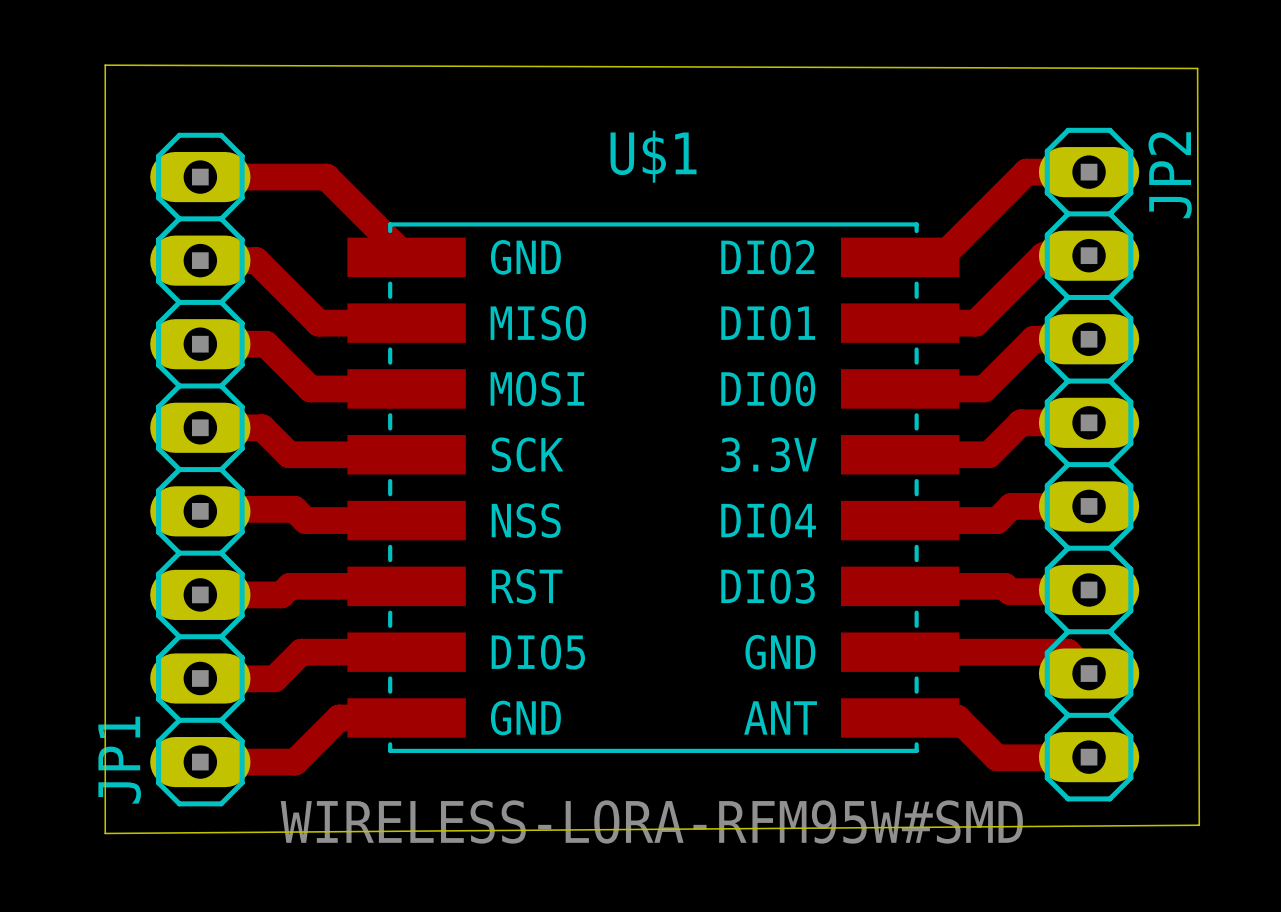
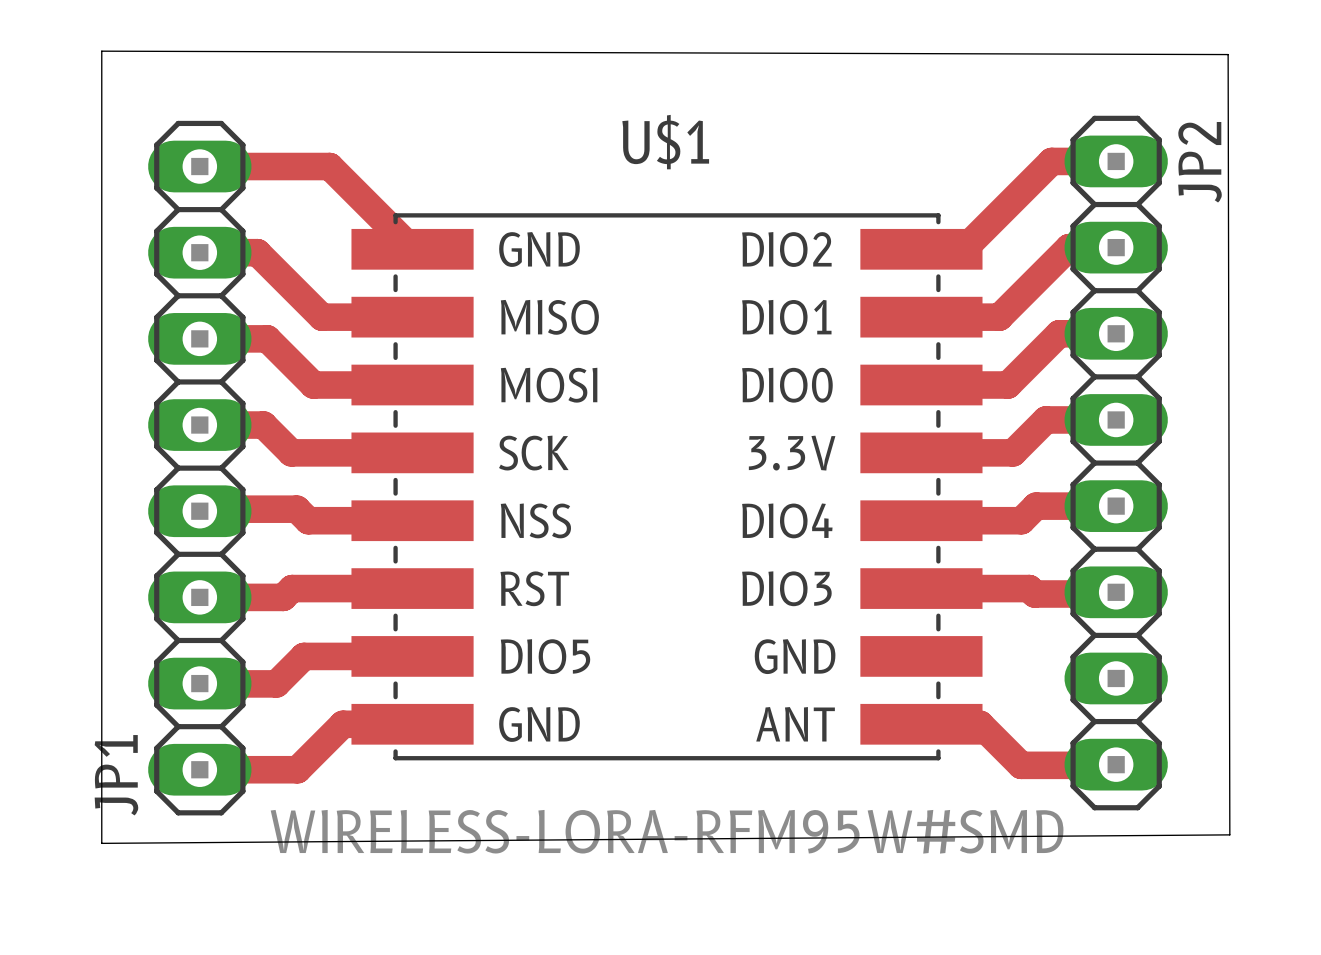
top track: (900, 652) (1067, 652) (1089, 673) -> none

